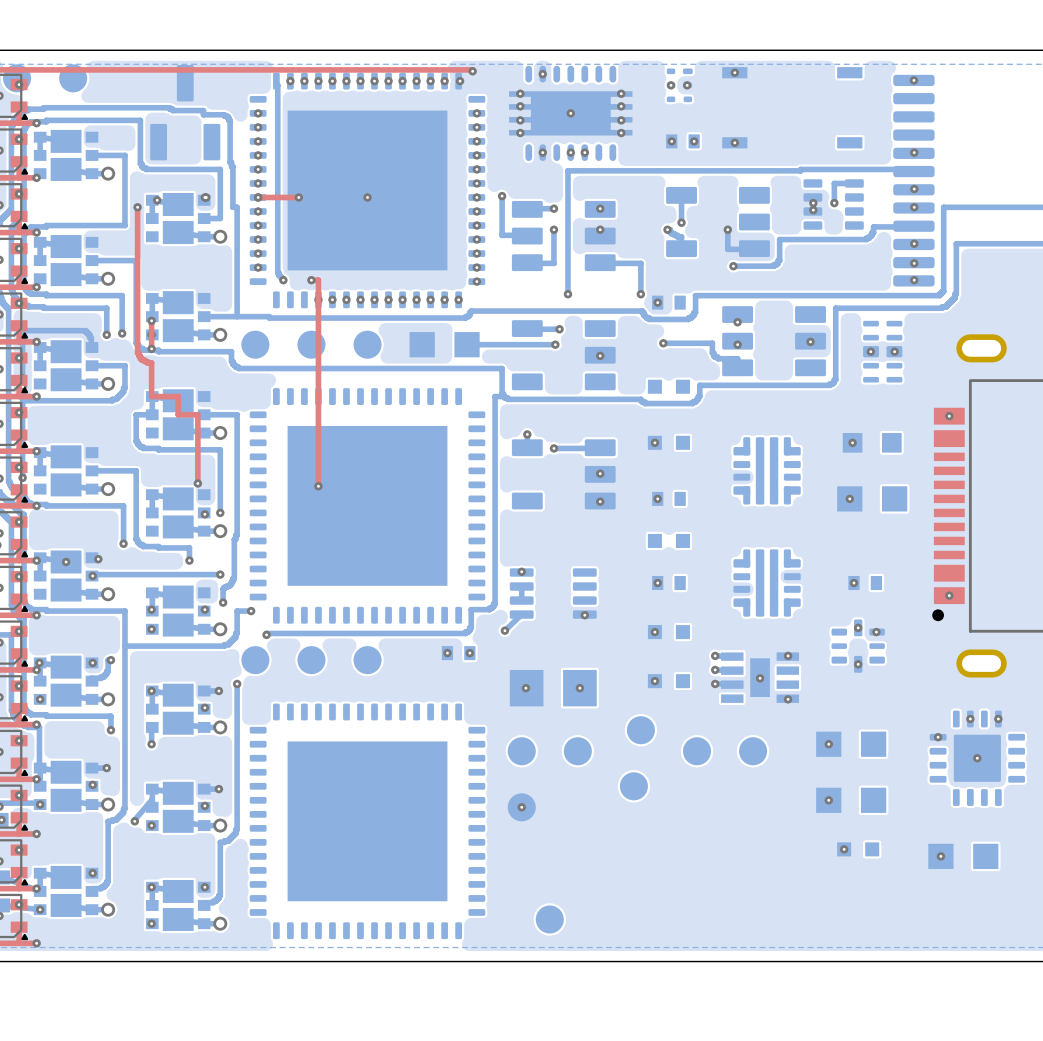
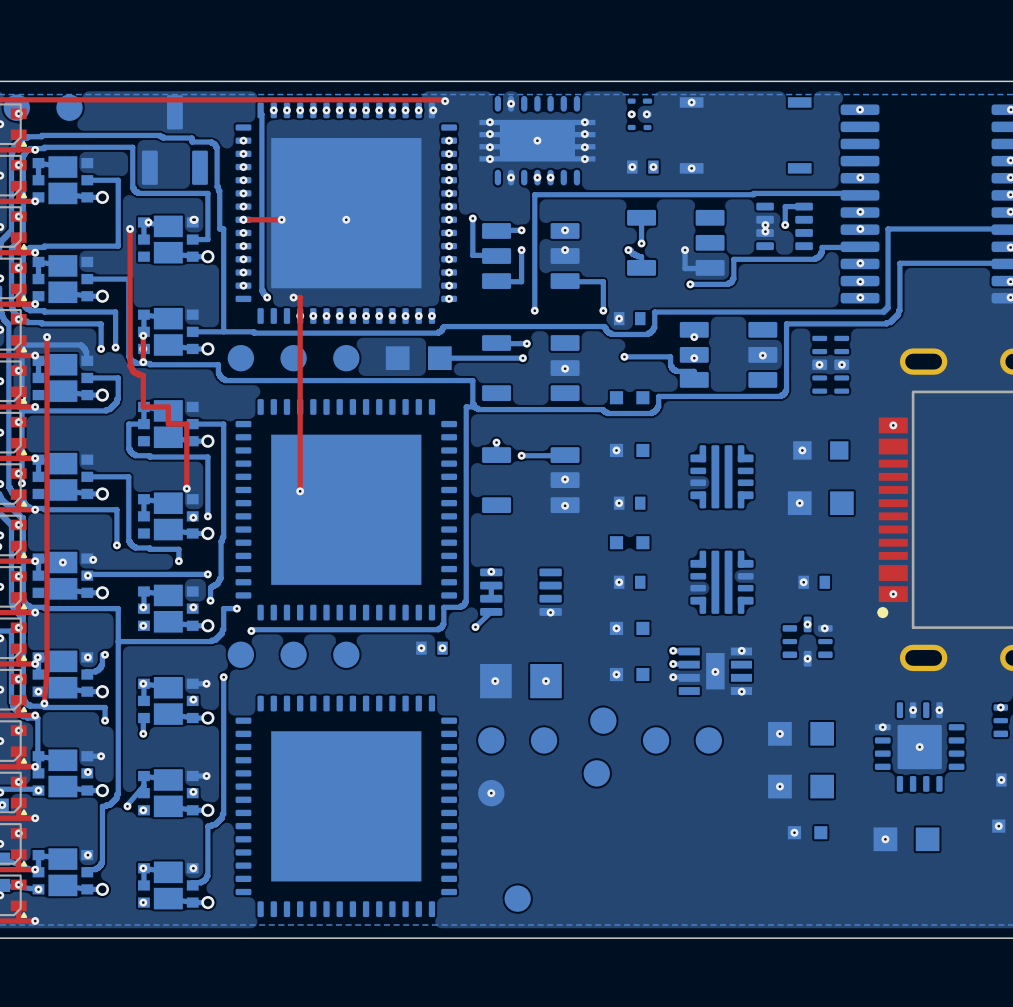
top track: none -> (47, 337) (47, 670) (44, 703)
via: none -> (47, 337)
via: none -> (44, 703)

